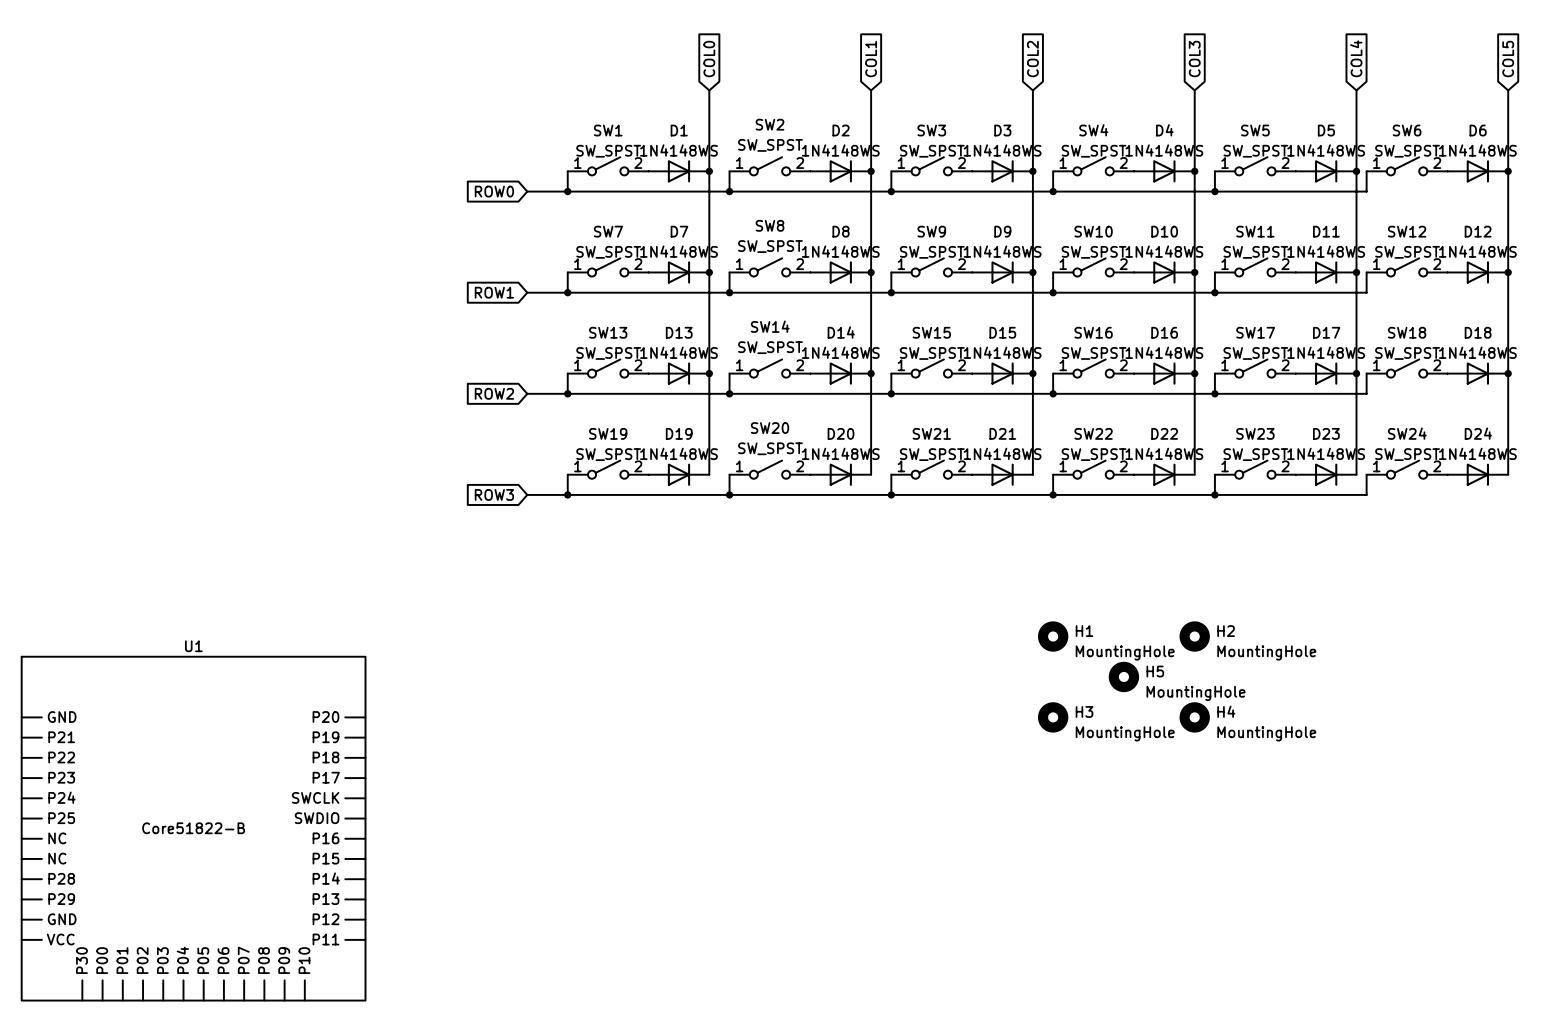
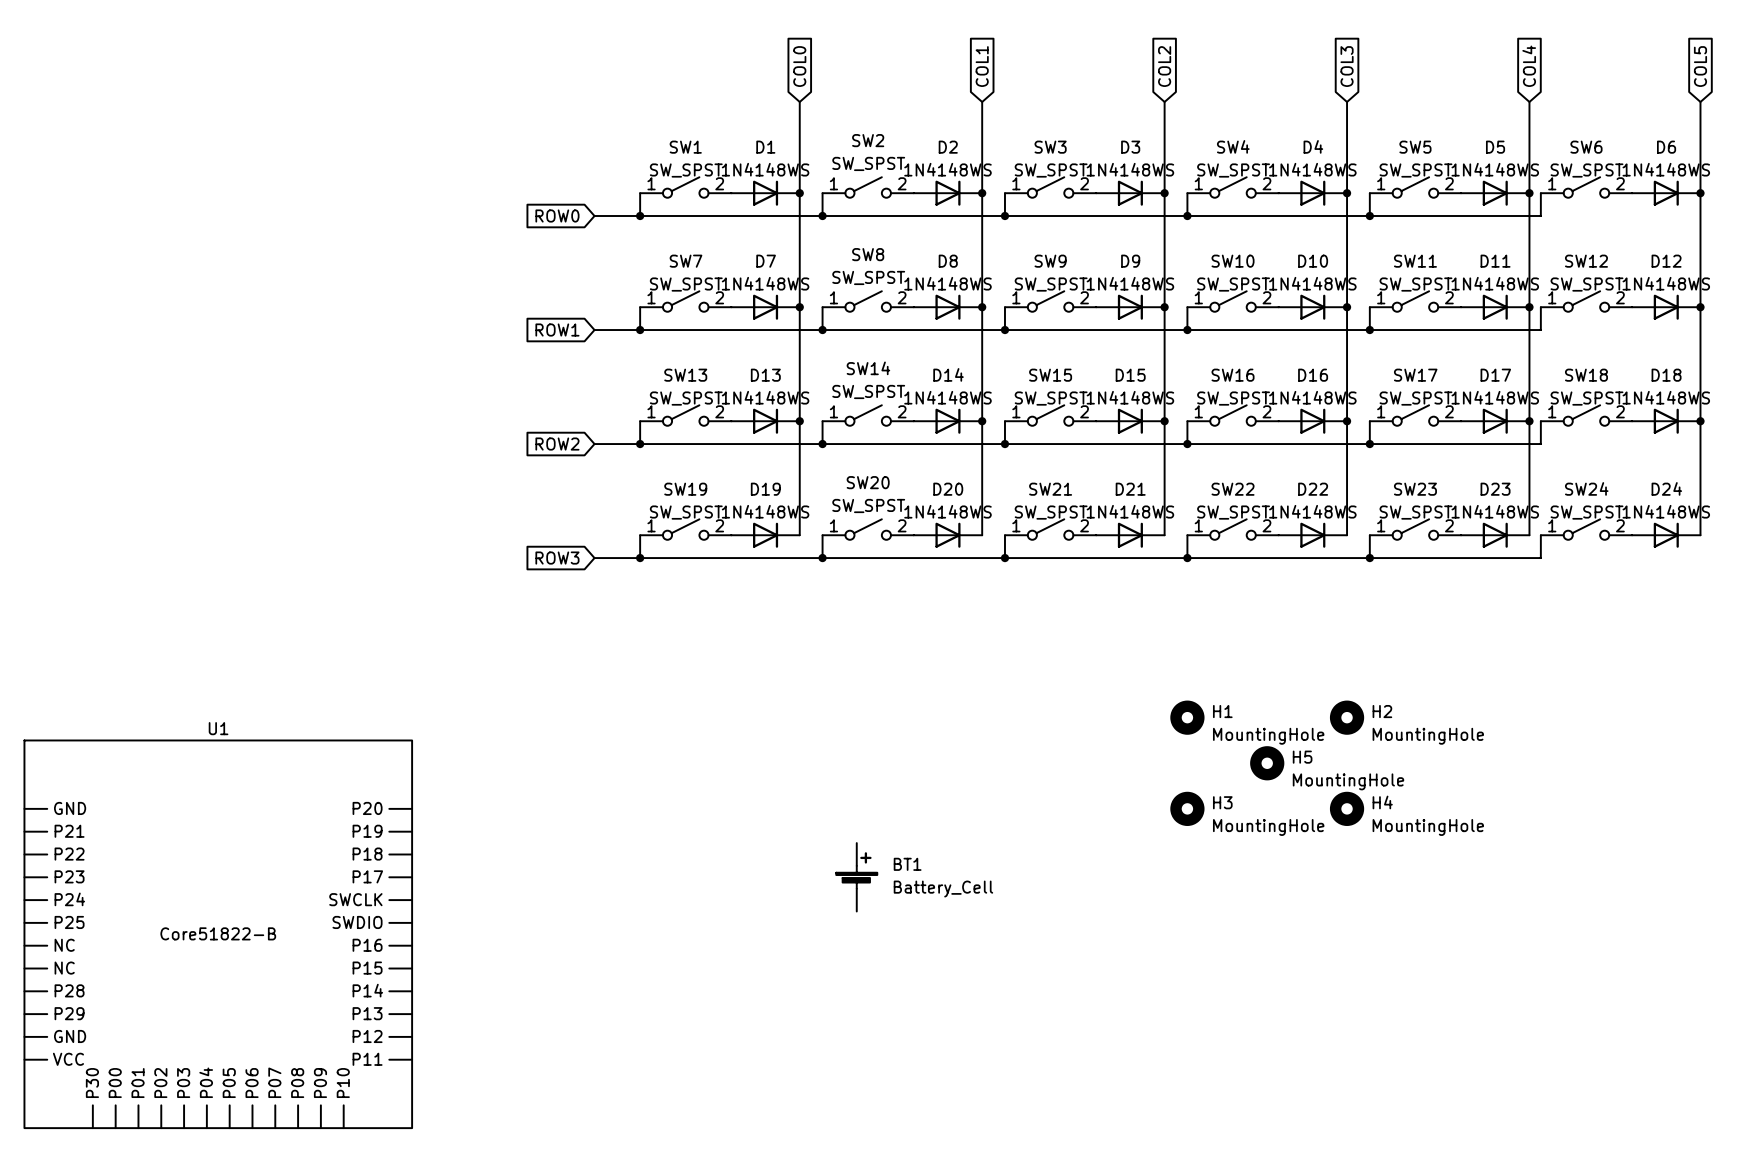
BT1: none -> Battery_Cell (856, 877)

